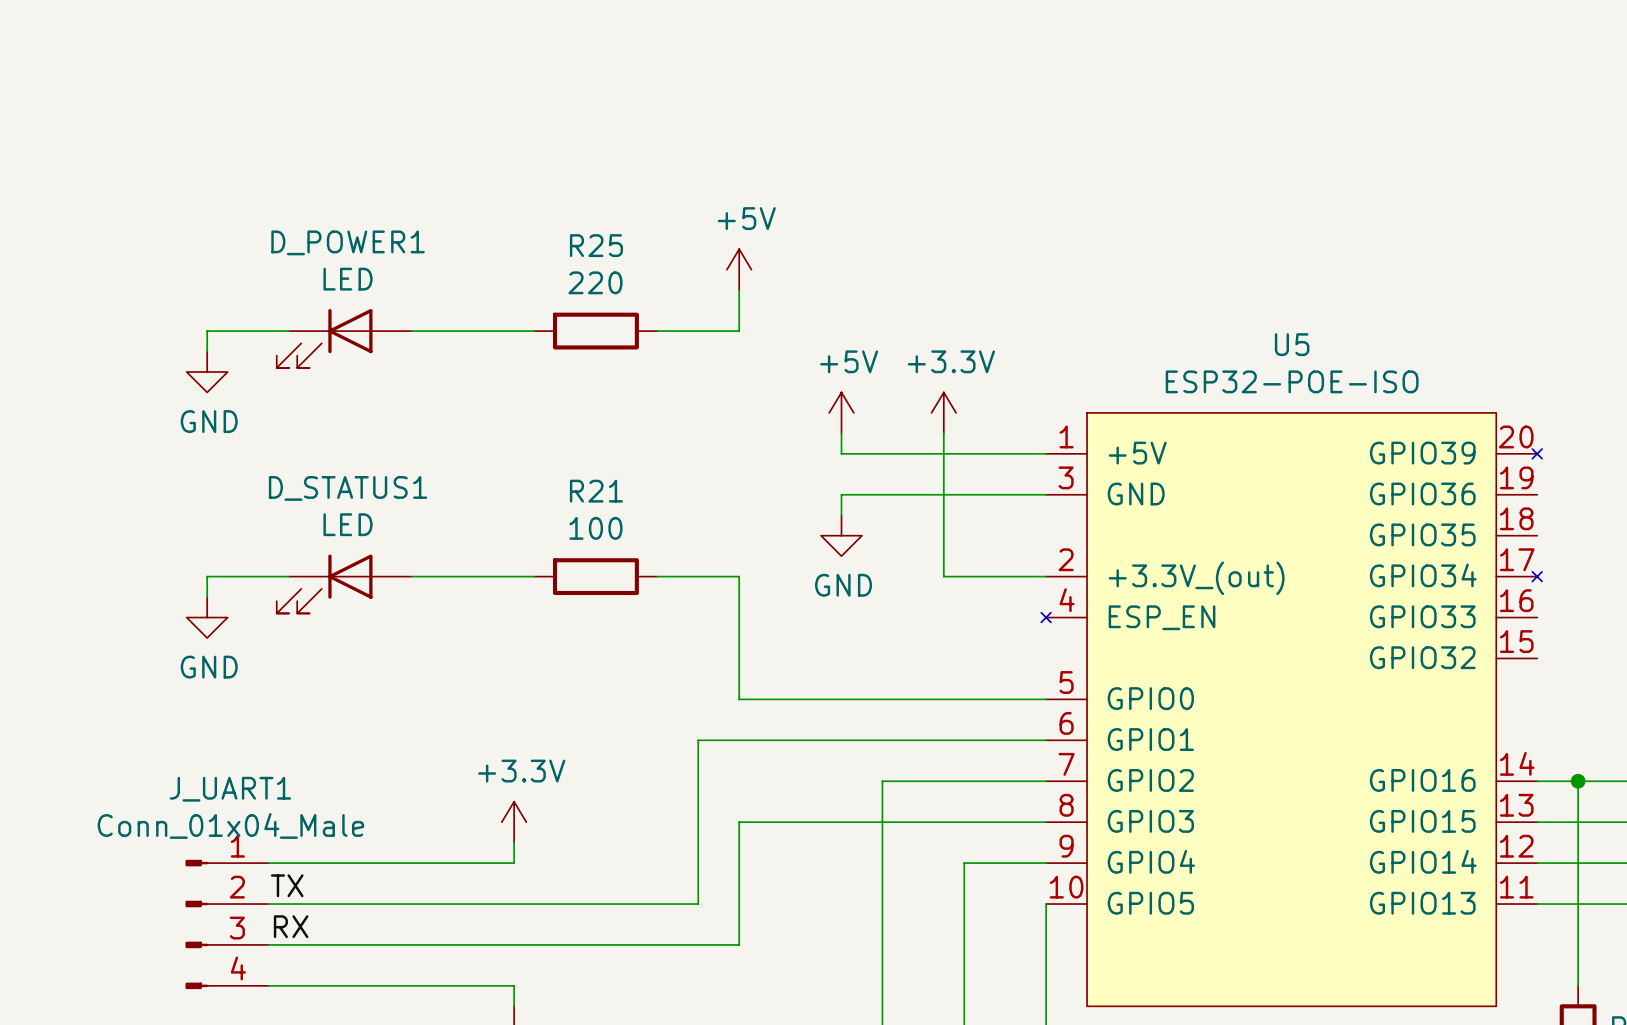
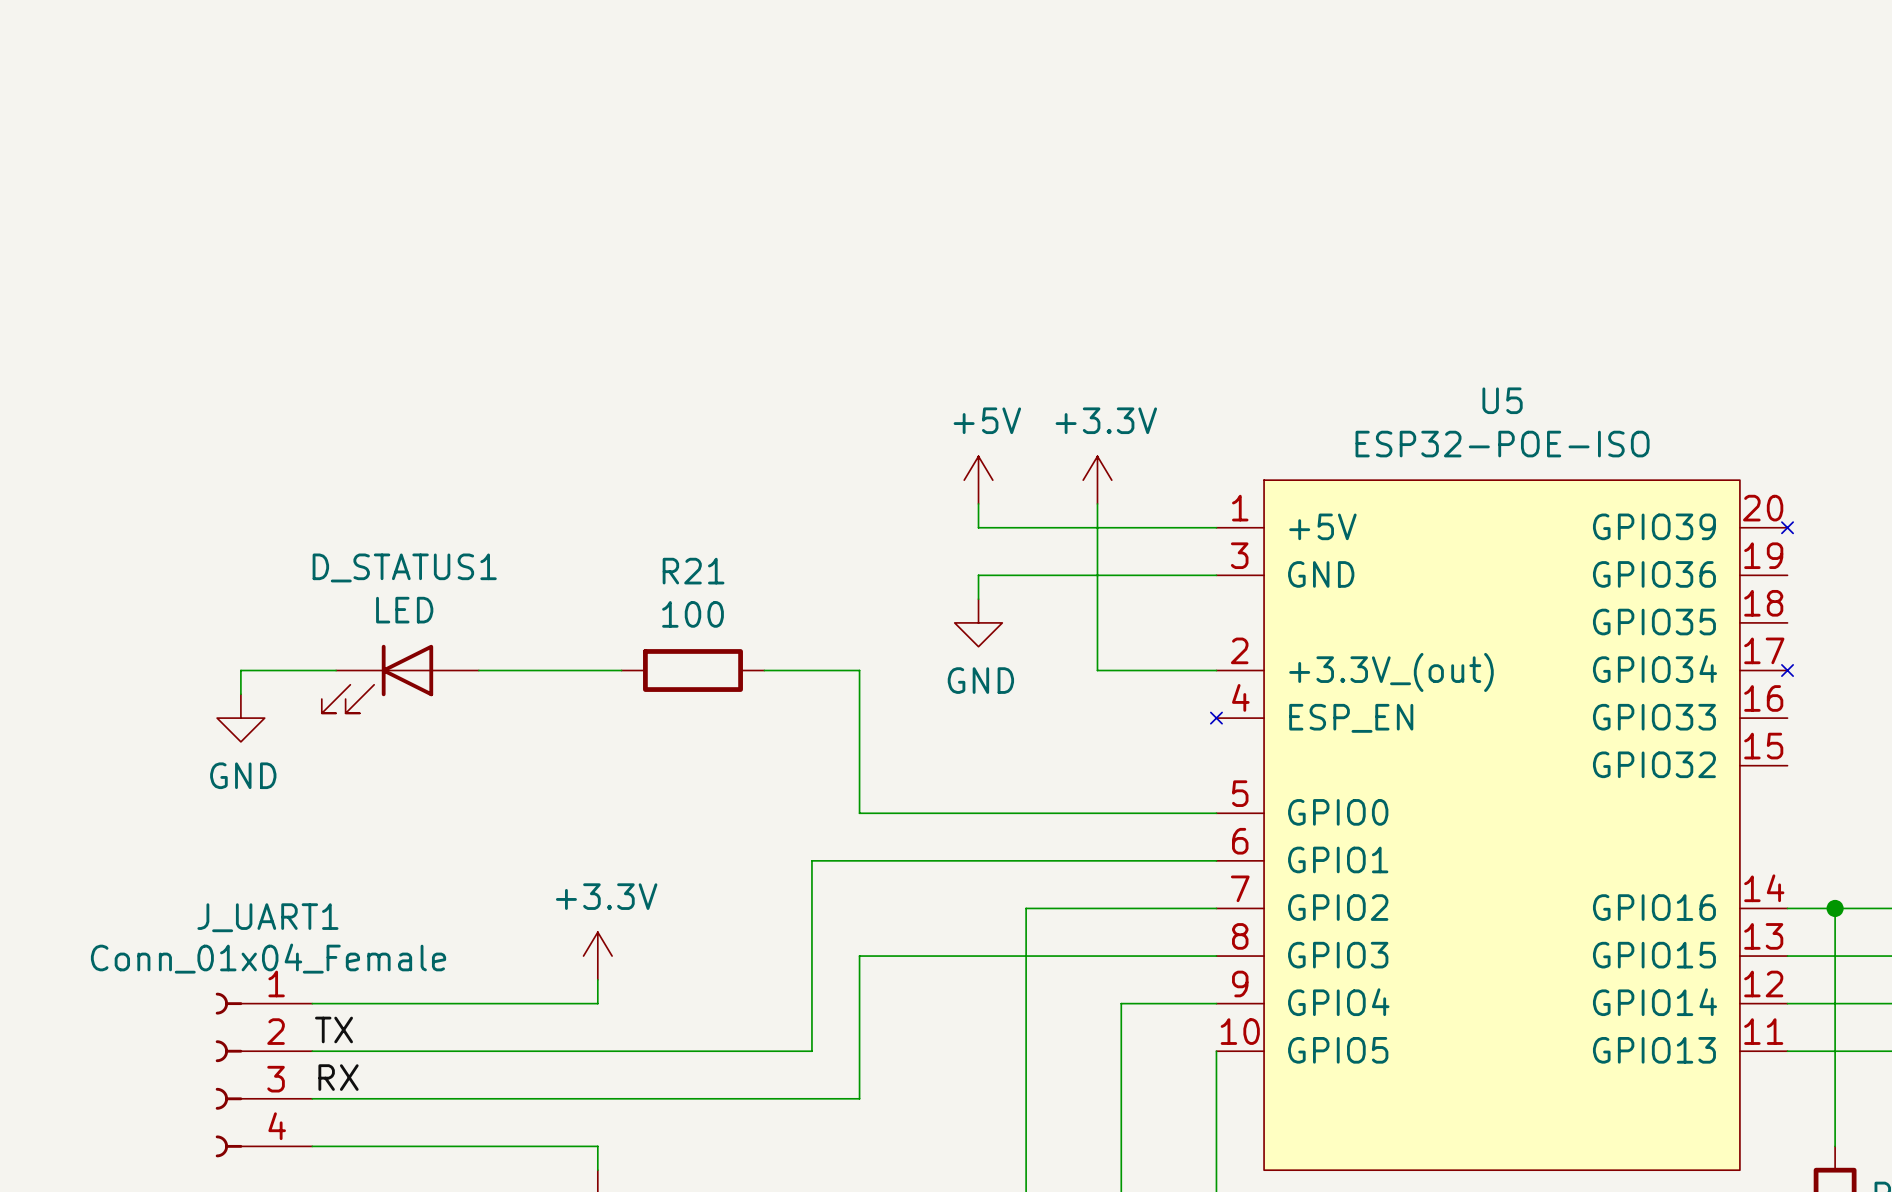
power symbol: +5V (739, 269) -> none
wire: (739, 290) (739, 331) (657, 331) -> none
wire: (289, 331) (207, 331) (207, 351) -> none
wire: (411, 331) (534, 331) -> none
R25: 220 (595, 331) -> none
D_POWER1: LED (344, 338) -> none
power symbol: GND (207, 371) -> none
J_UART1 value: Conn_01x04_Male (230, 825) -> Conn_01x04_Female (268, 958)
J_UART1 symbol: [185, 859, 269, 990] -> [215, 992, 313, 1158]

